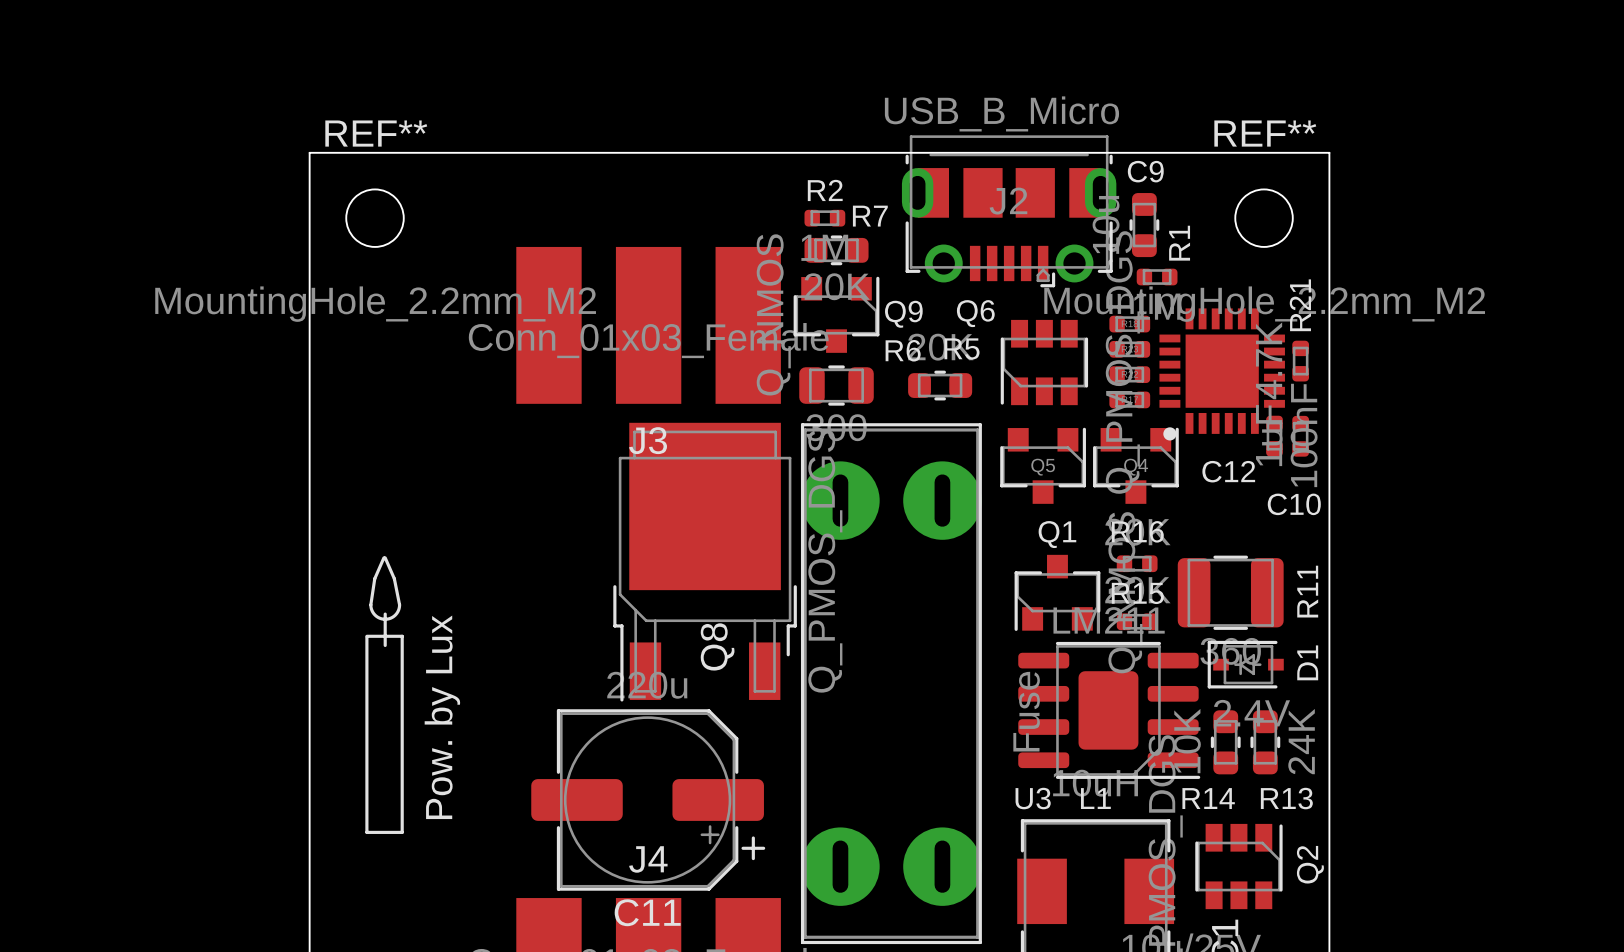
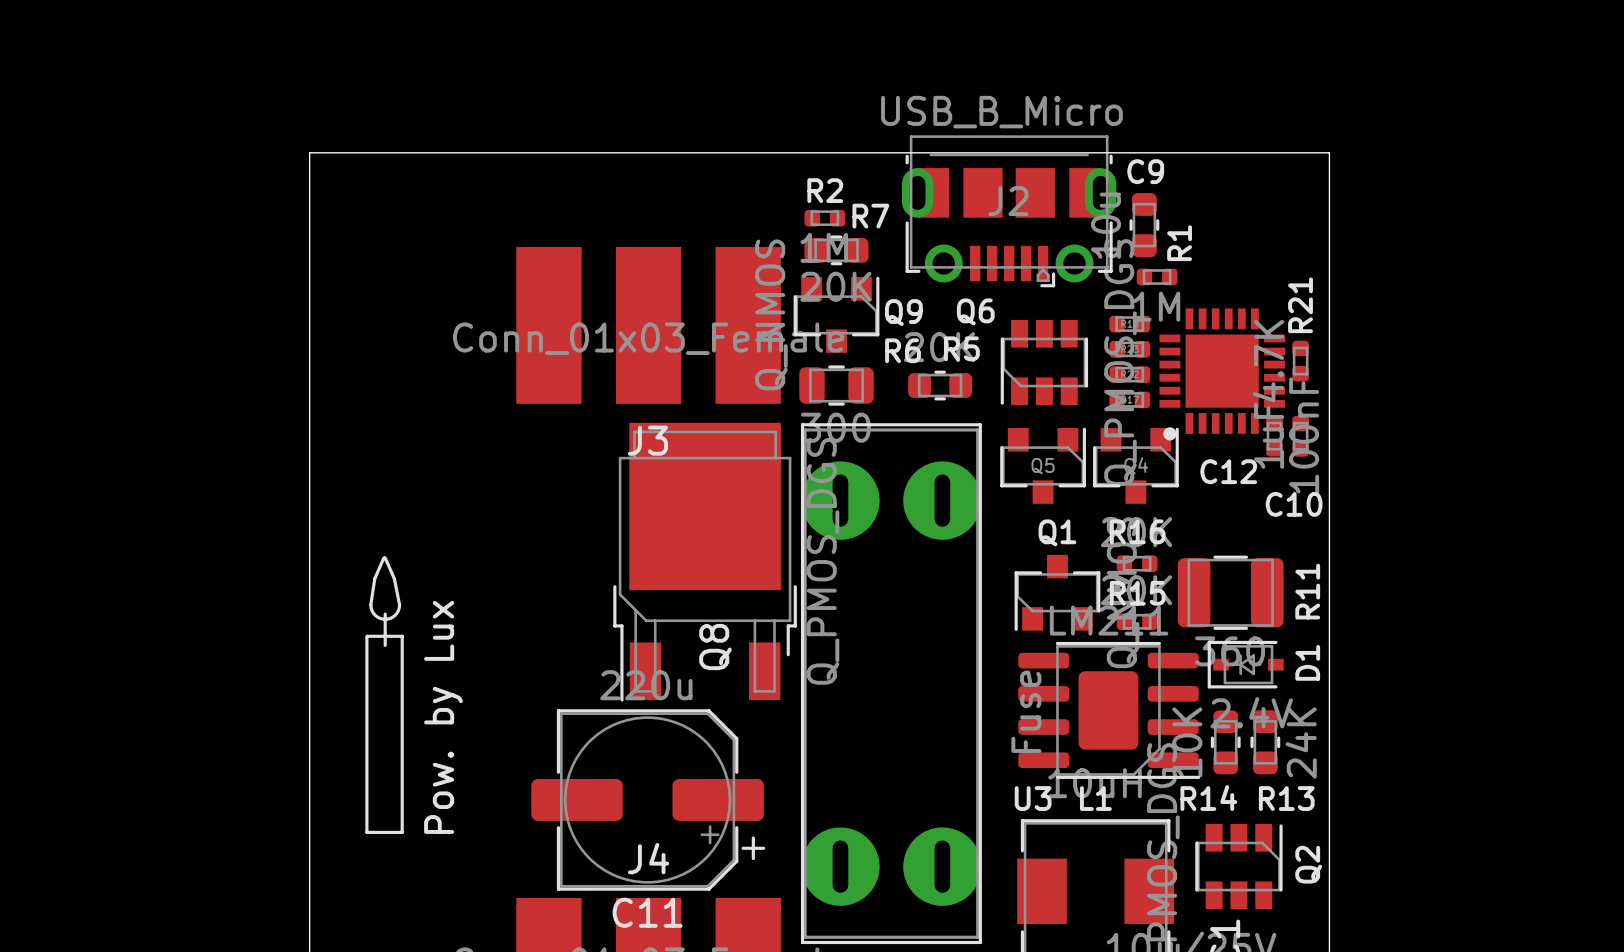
REF**: MountingHole_2.2mm_M2 (375, 218) -> none
REF**: MountingHole_2.2mm_M2 (1264, 218) -> none

